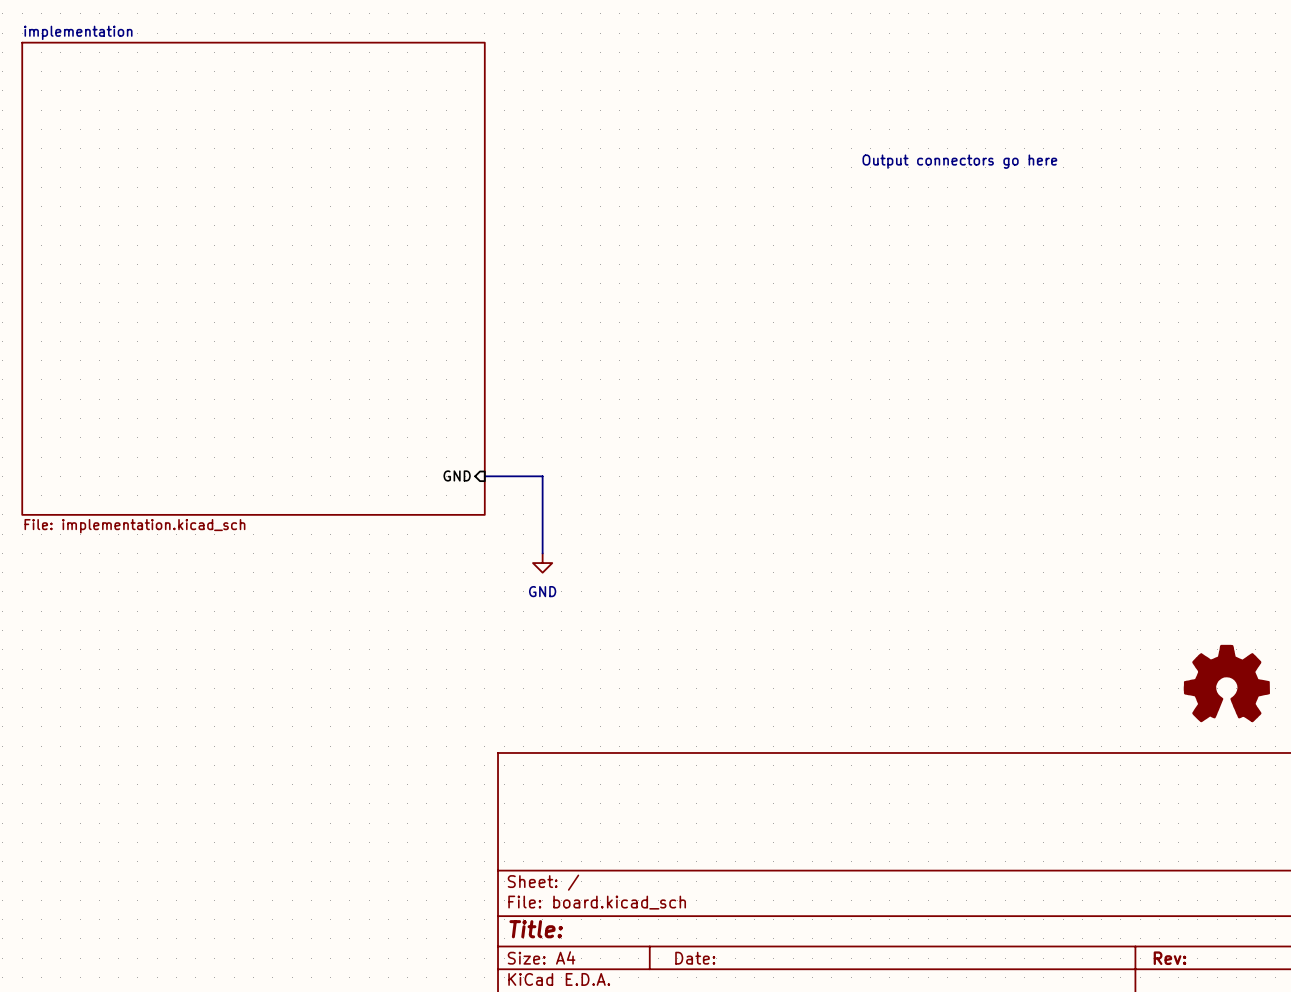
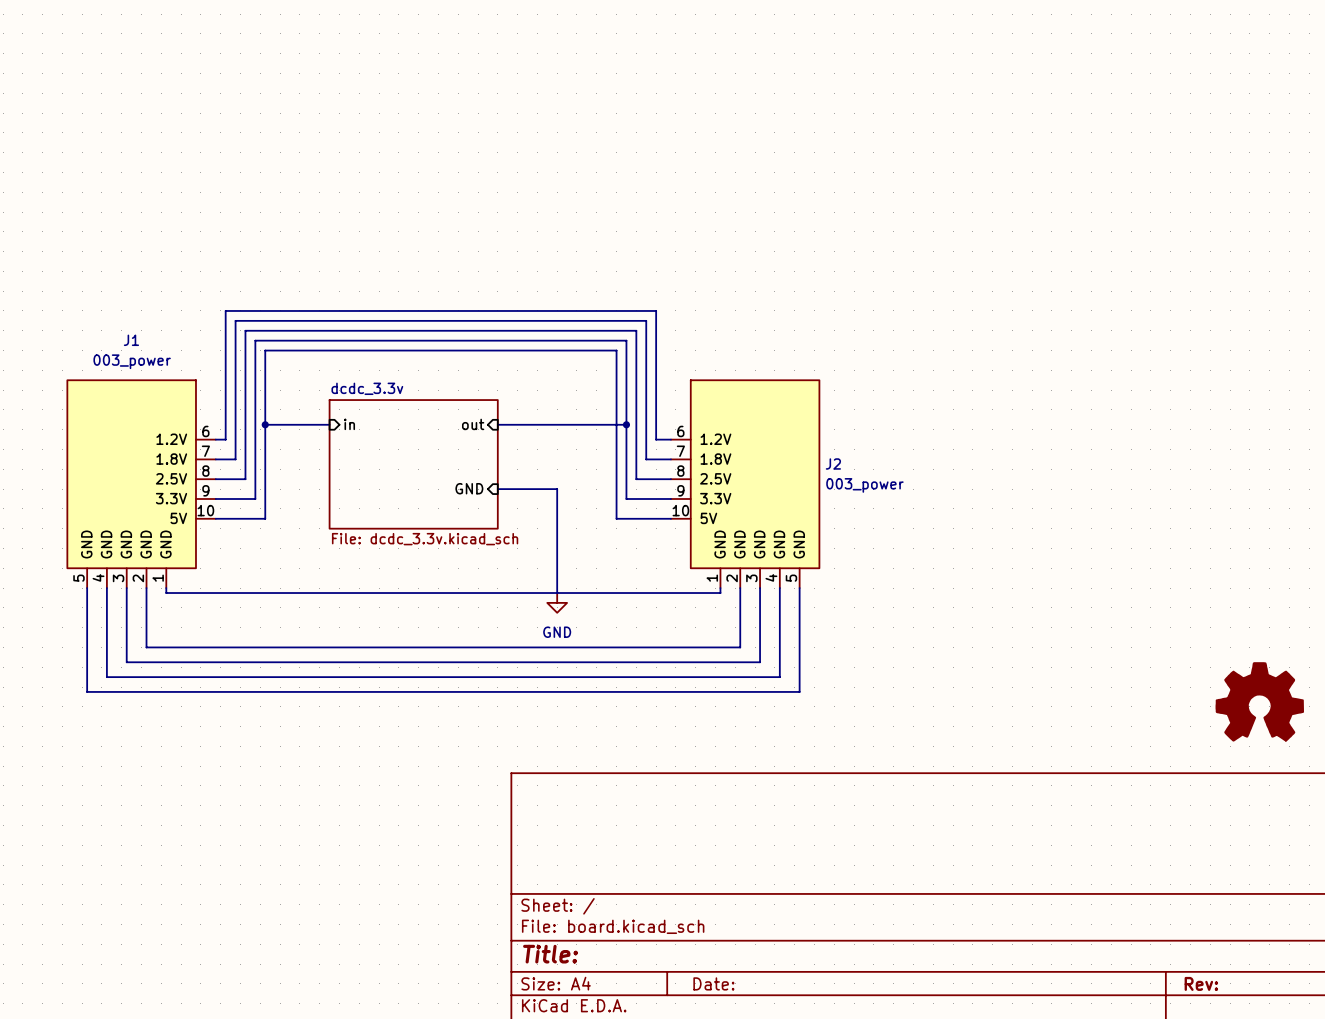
text: Output connectors go here (959, 161) -> none
sheet implementation: File: implementation.kicad_sch (253, 278) -> none
wire: none -> (265, 424) (329, 424)
junction: none -> (265, 424)
sheet pin: none -> in (349, 424)
sheet pin: none -> out (473, 424)
wire: none -> (497, 424) (626, 424)
junction: none -> (626, 424)
wire: none -> (215, 439) (225, 439) (225, 310) (656, 310) (656, 439) (670, 439)
wire: none -> (215, 459) (235, 459) (235, 320) (646, 320) (646, 459) (670, 459)
sheet dcdc_3.3v: none -> File: dcdc_3.3v.kicad_sch (413, 464)
wire: none -> (215, 479) (245, 479) (245, 330) (636, 330) (636, 479) (670, 479)
J1: none -> 003_power (141, 484)
J2: none -> 003_power (745, 484)
wire: none -> (215, 498) (255, 498) (255, 340) (626, 340) (626, 498) (670, 498)
wire: none -> (215, 518) (265, 518) (265, 350) (616, 350) (616, 518) (670, 518)
power symbol position: GND (542, 563) -> GND (557, 602)
wire: none -> (87, 588) (87, 691) (799, 691) (799, 588)
wire: none -> (106, 588) (106, 677) (779, 677) (779, 588)
wire: none -> (126, 588) (126, 662) (760, 662) (760, 588)
wire: none -> (146, 588) (146, 647) (740, 647) (740, 588)
wire: none -> (166, 588) (166, 593) (720, 593) (720, 588)

